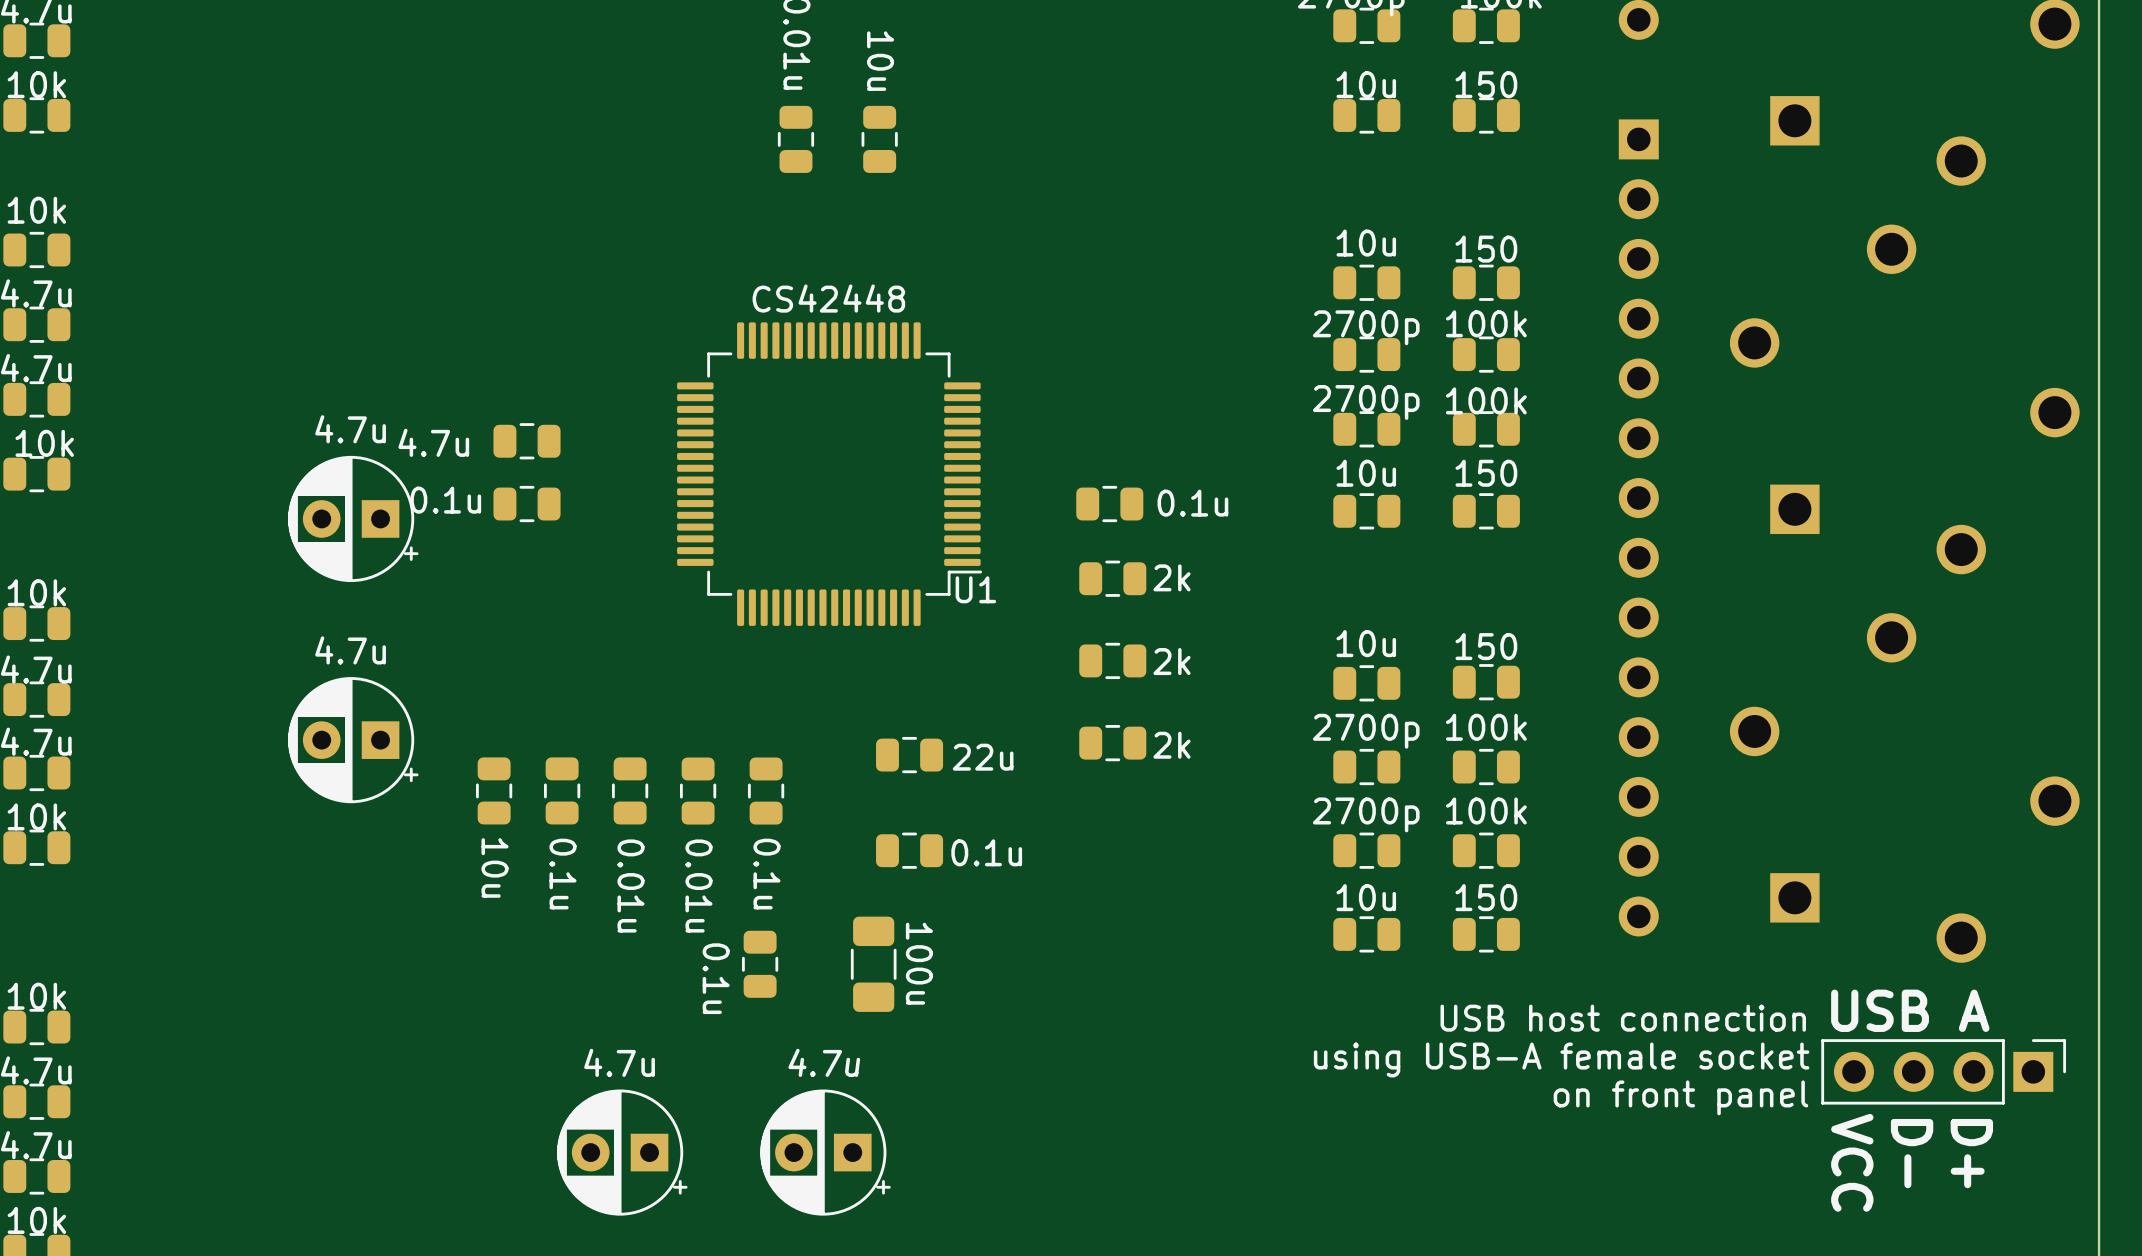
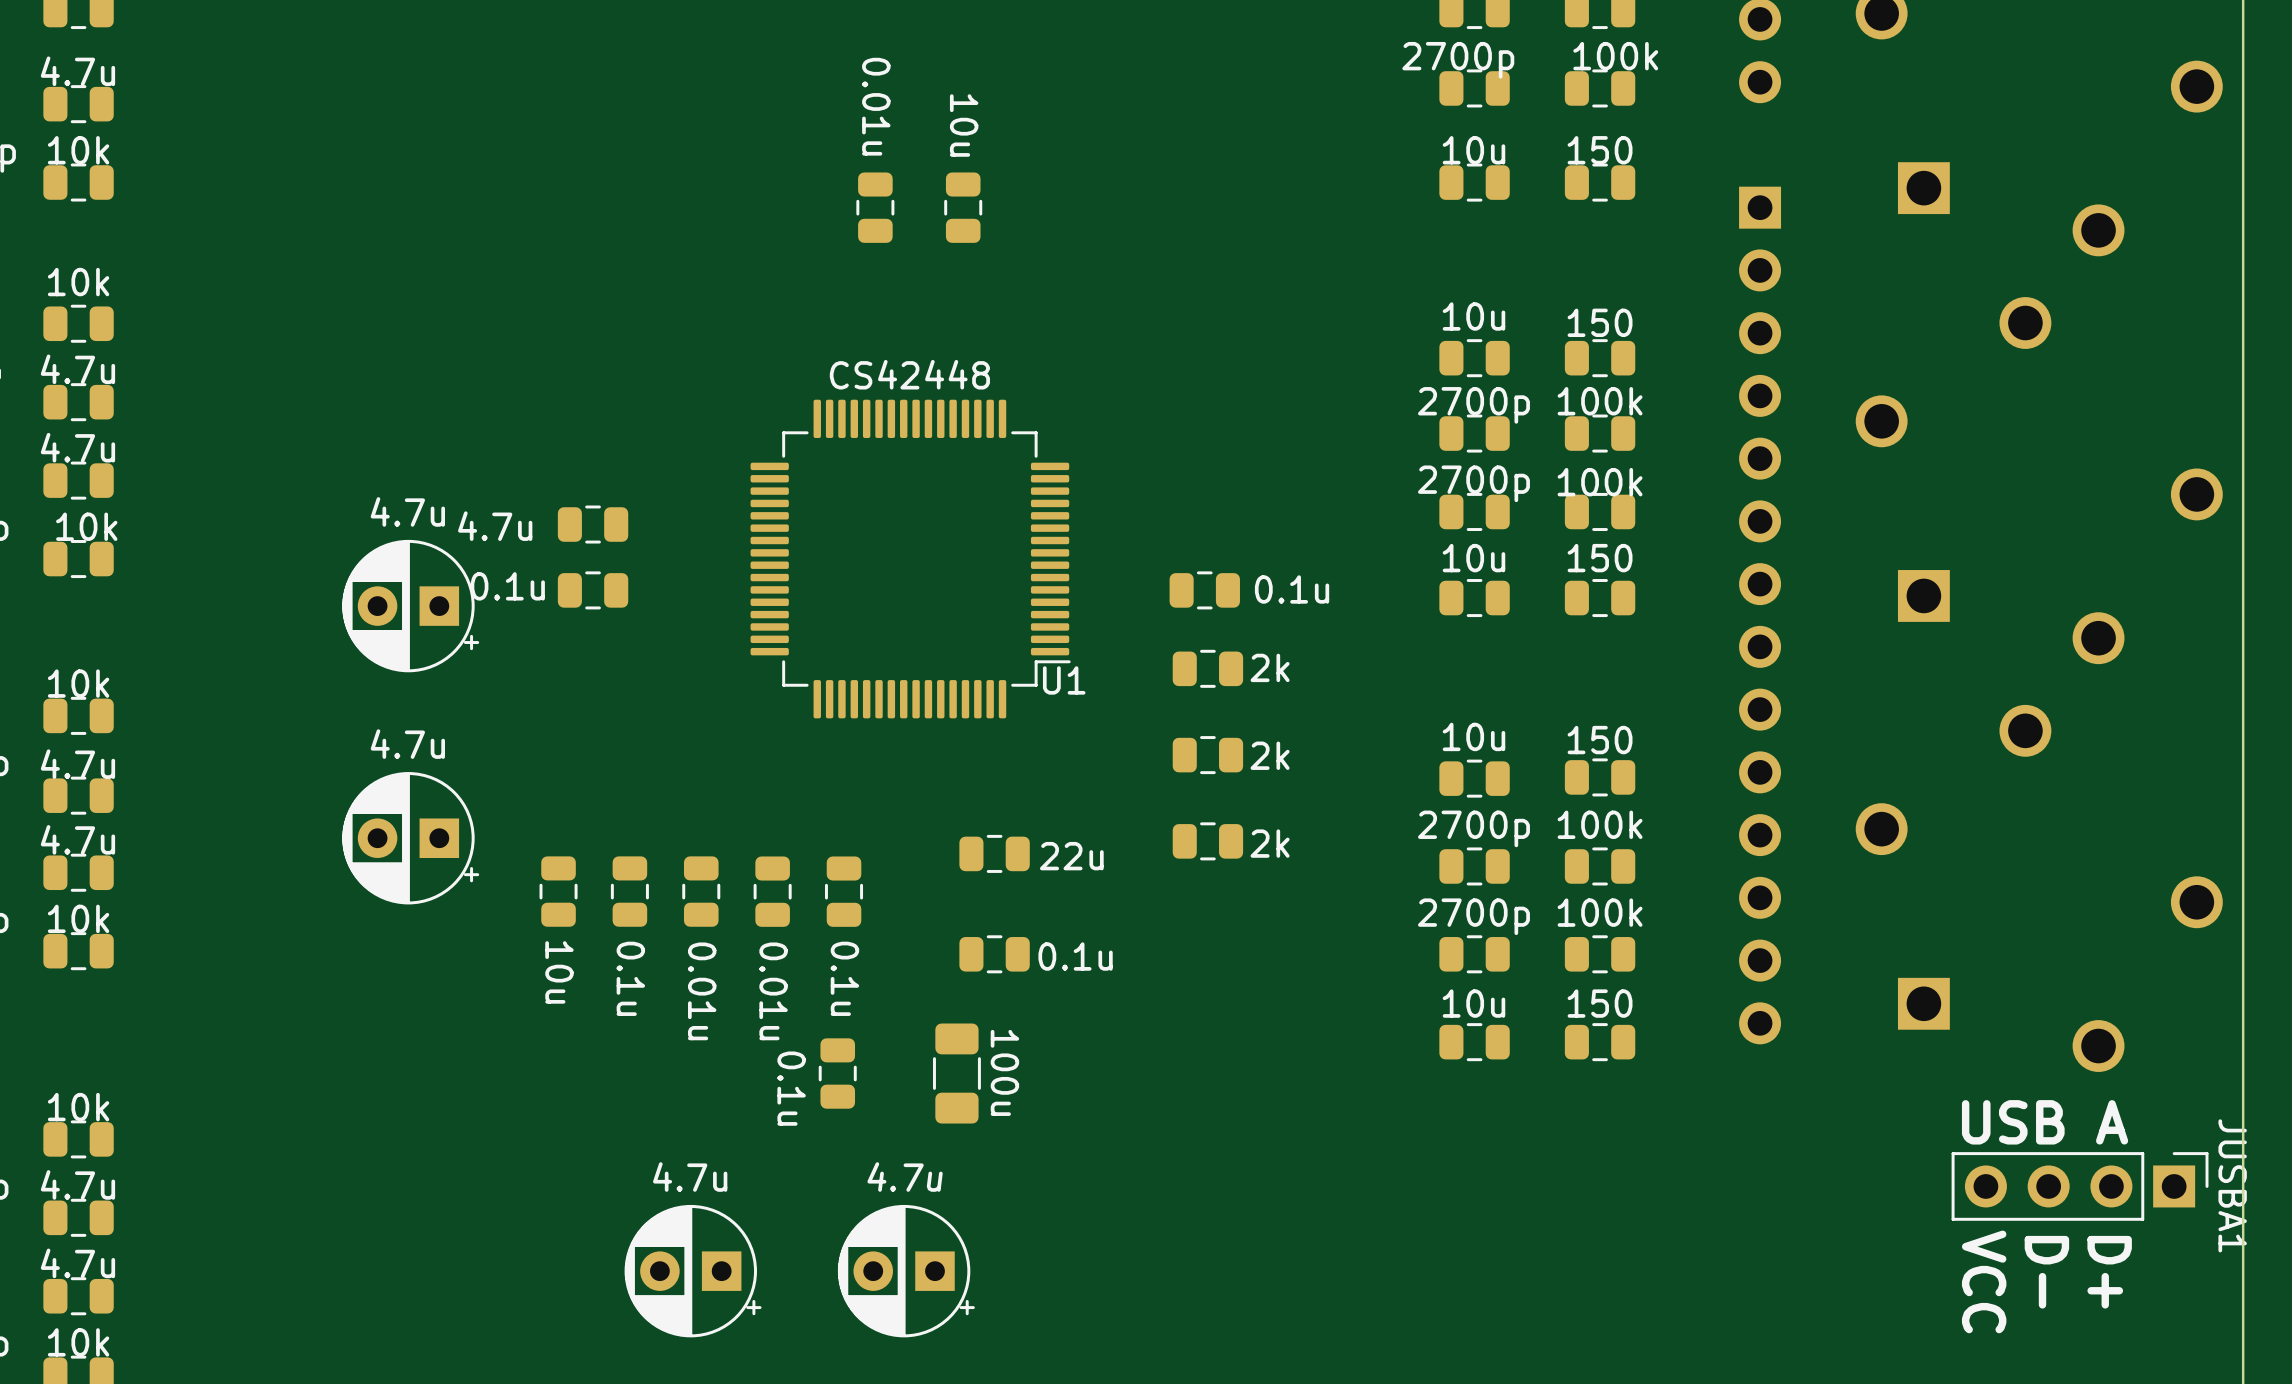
text: USB host connection (1623, 1018) -> none
text: using USB-A female socket (1561, 1059) -> none
JUSBA1 name: none -> JUSBA1 (2232, 1185)
text: on front panel (1680, 1097) -> none

